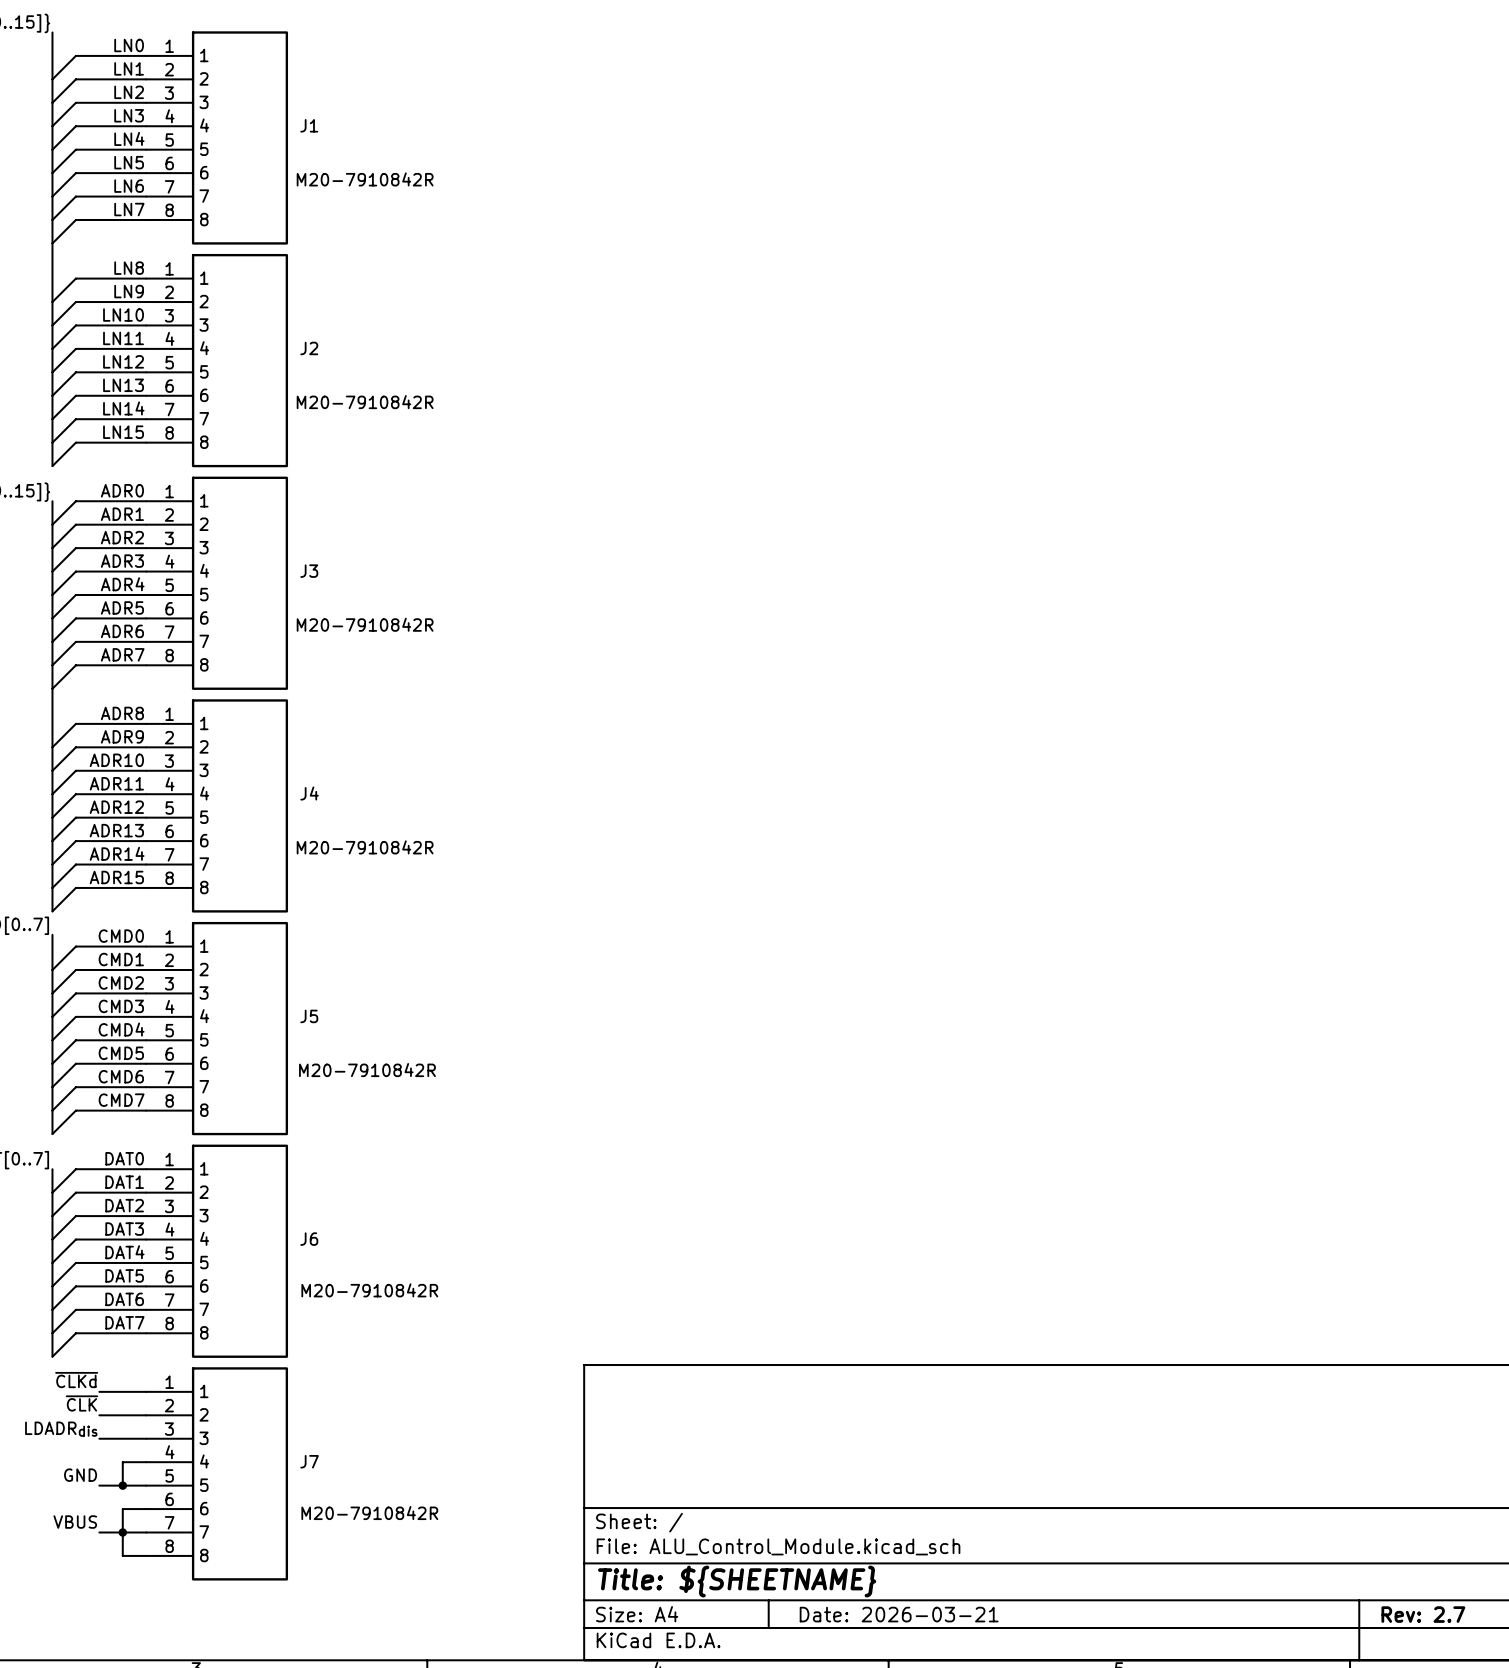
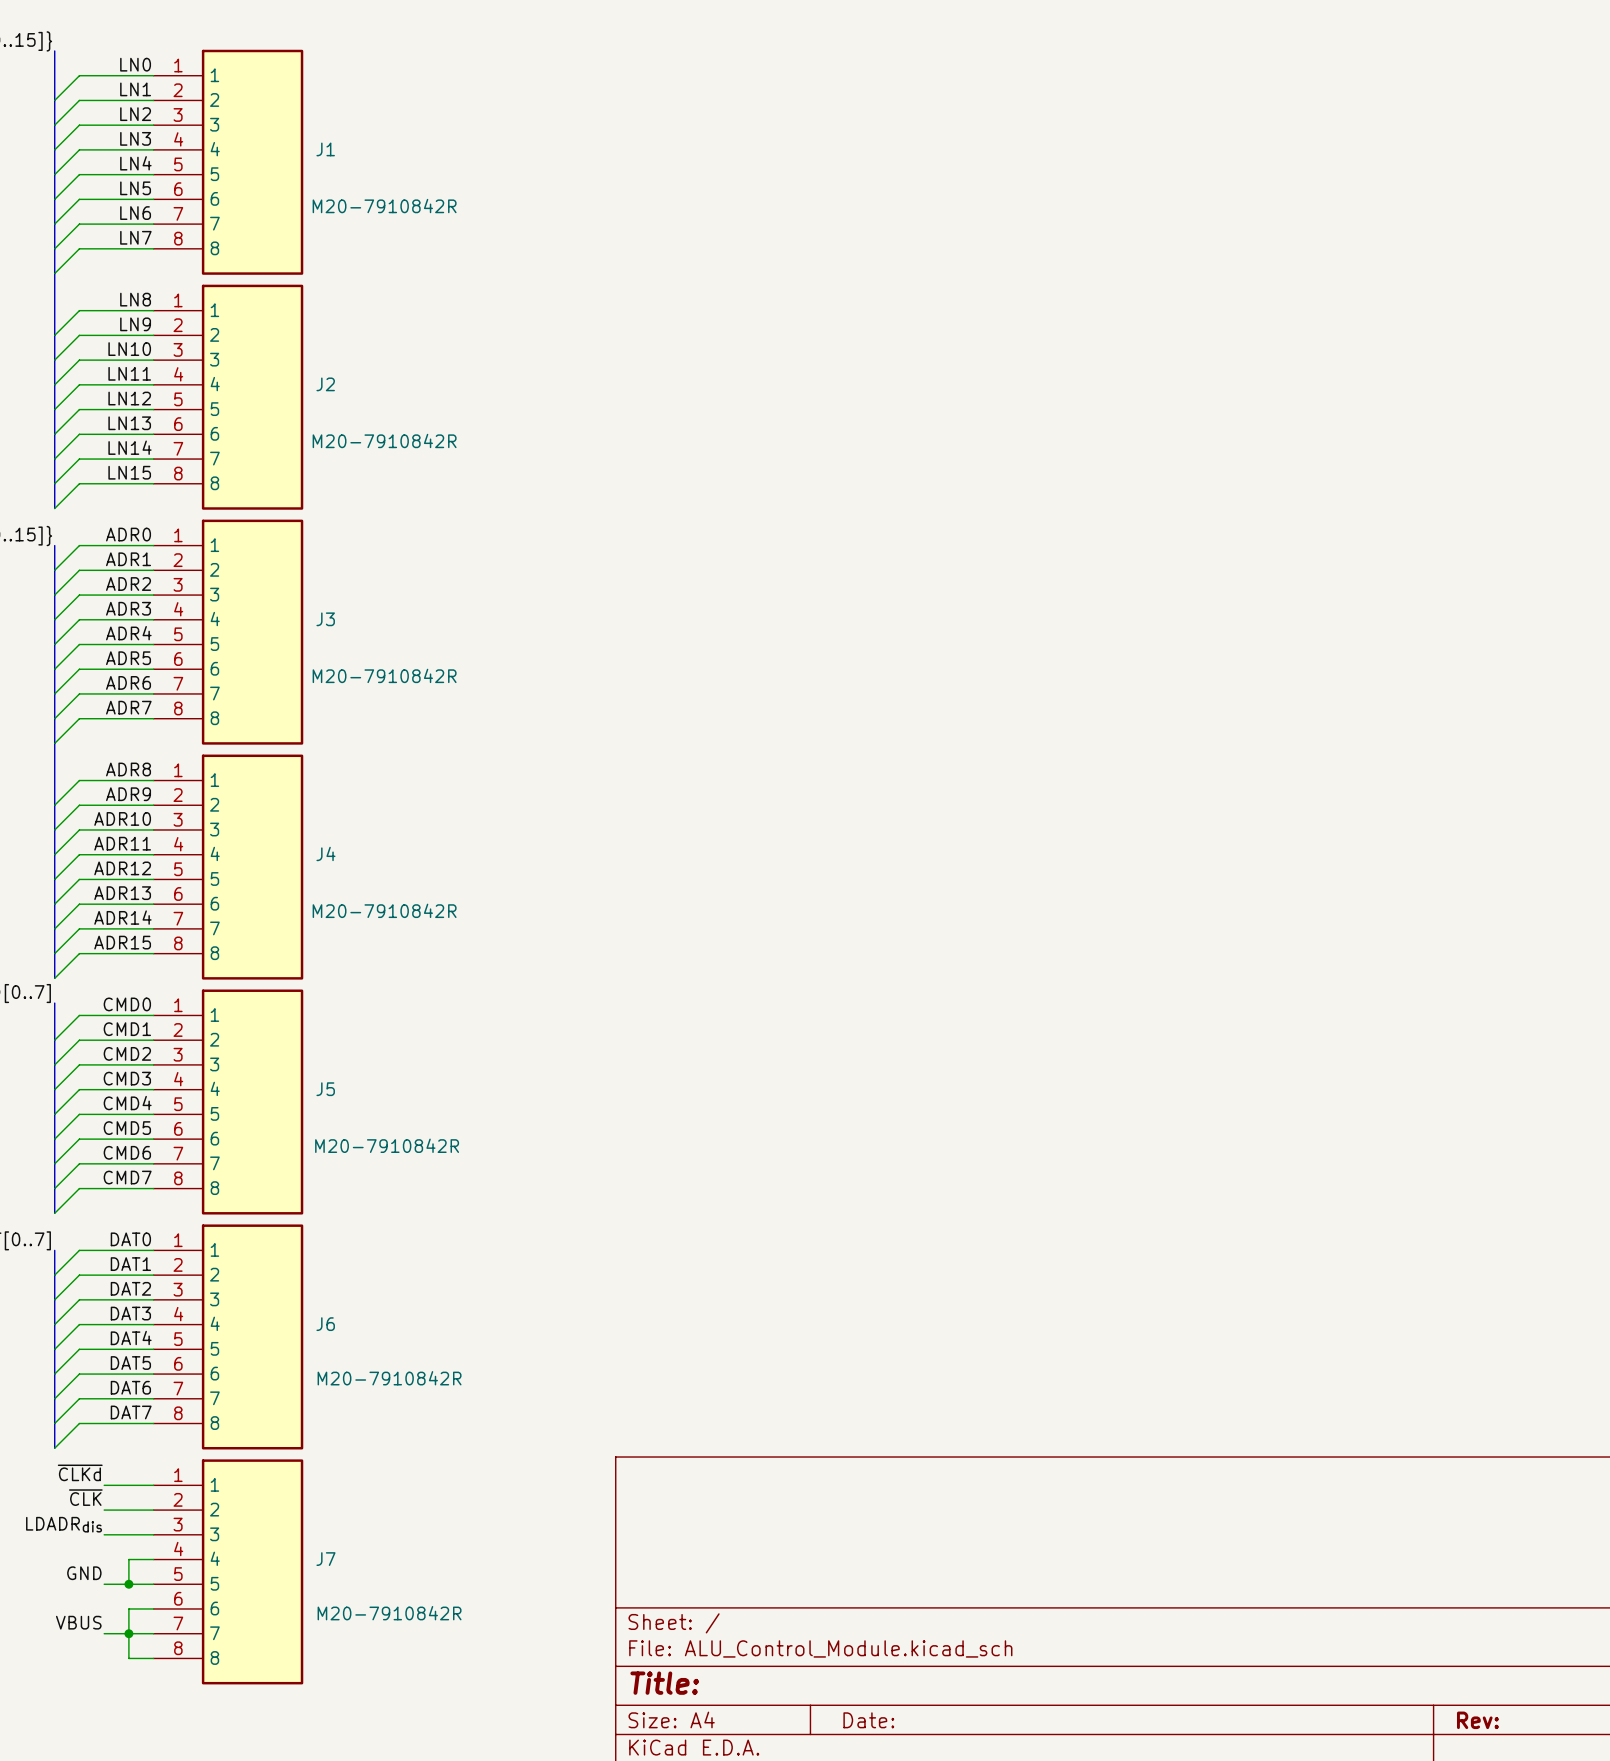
title block: Title: ${SHEETNAME} (737, 1581) -> Title: (664, 1683)
title block: Date: 2026-03-21 (899, 1614) -> Date: (868, 1720)
title block: Rev: 2.7 (1423, 1614) -> Rev: (1477, 1720)

